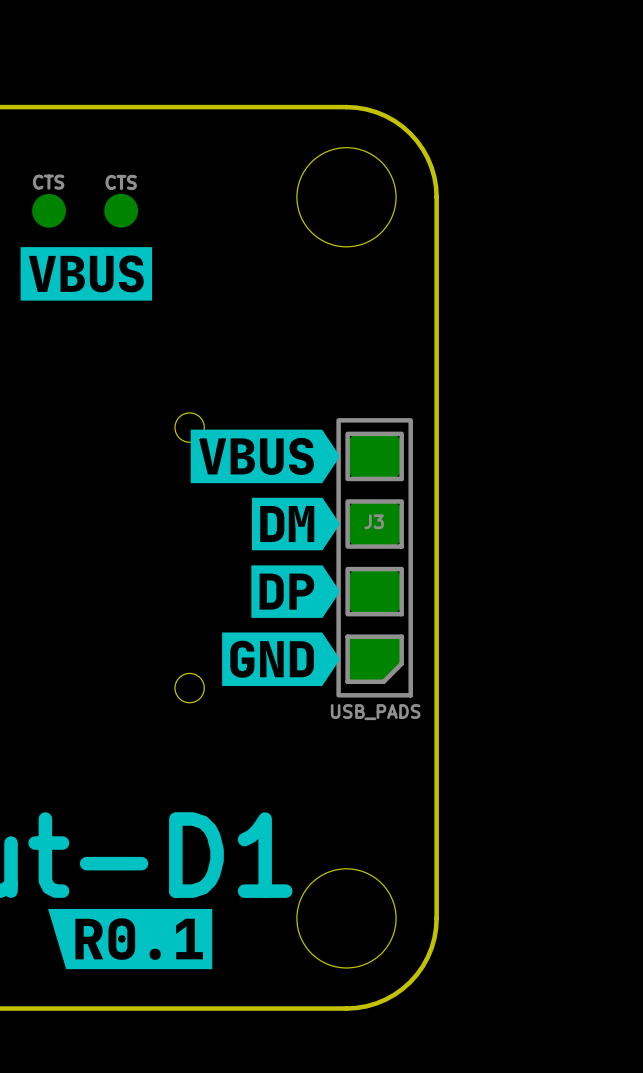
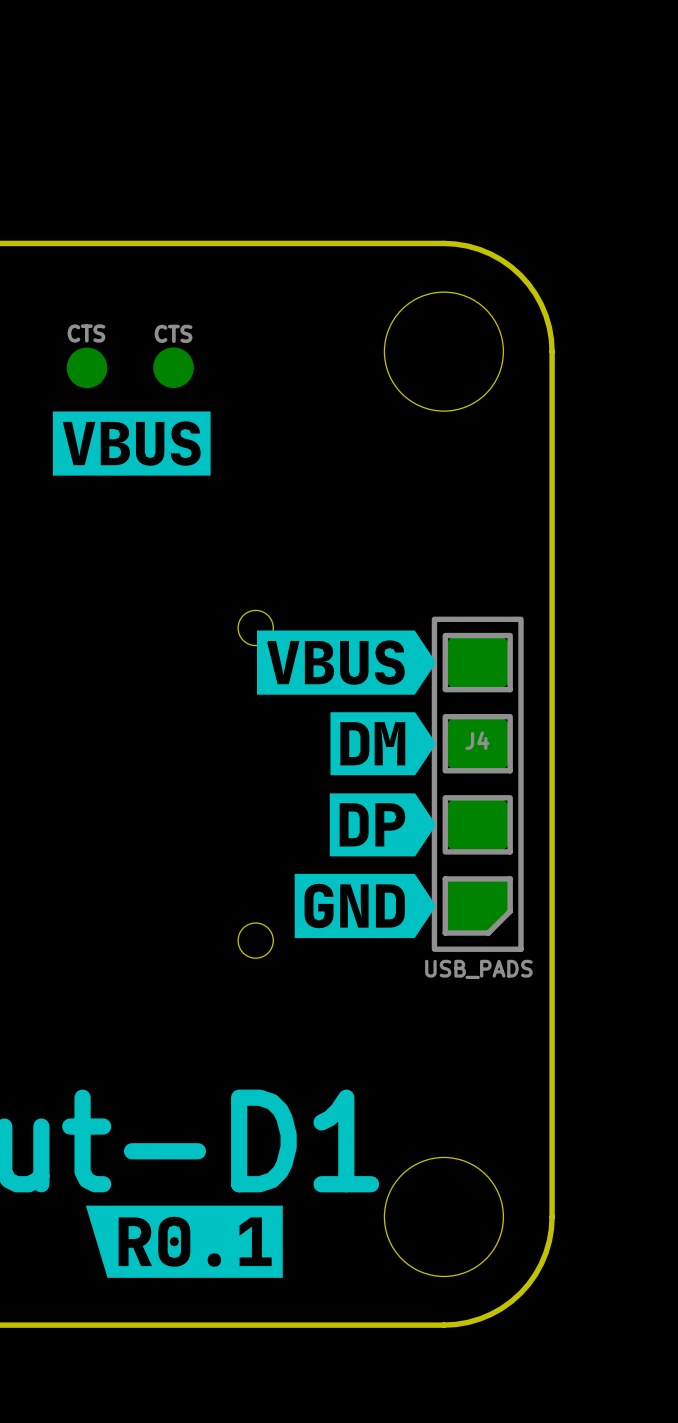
J3 name: J3 (374, 521) -> J4 (477, 740)

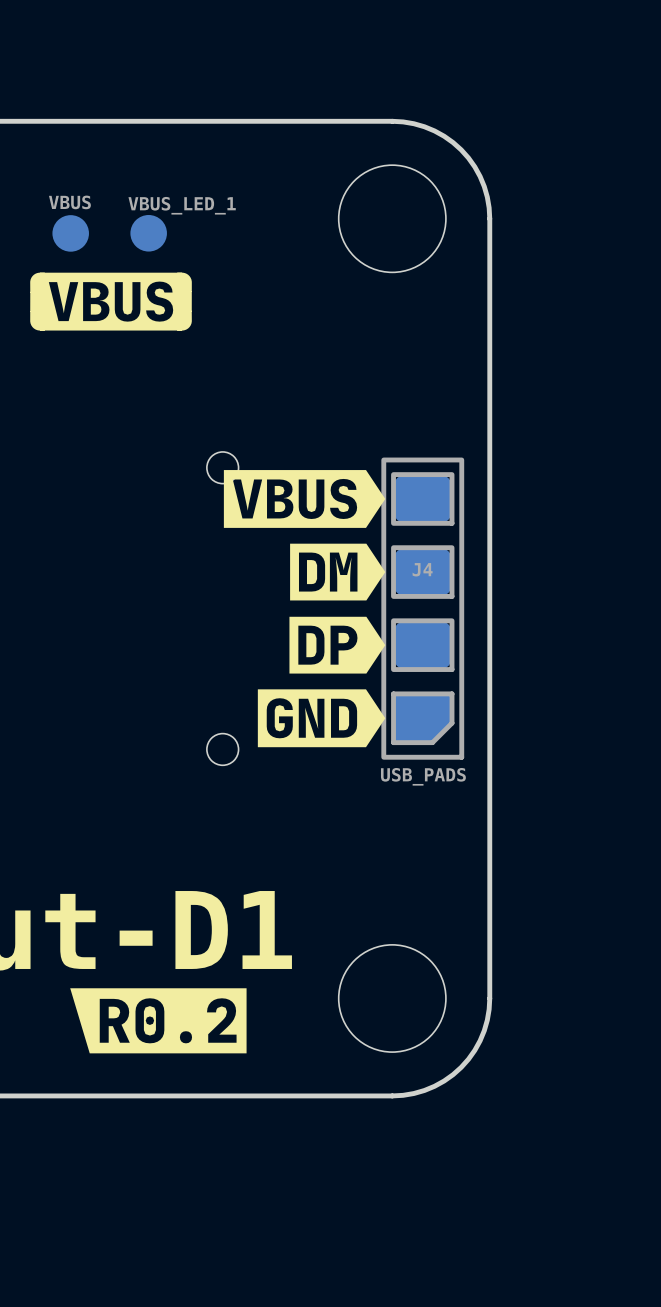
part value: CTS (86, 333) -> VBUS (69, 202)
part value: CTS (173, 333) -> VBUS_LED_1 (182, 205)
drawing: none -> [30, 272, 45, 331]
drawing: none -> [177, 272, 192, 331]
drawing shape: [85, 1205, 283, 1278] -> [70, 988, 247, 1054]

